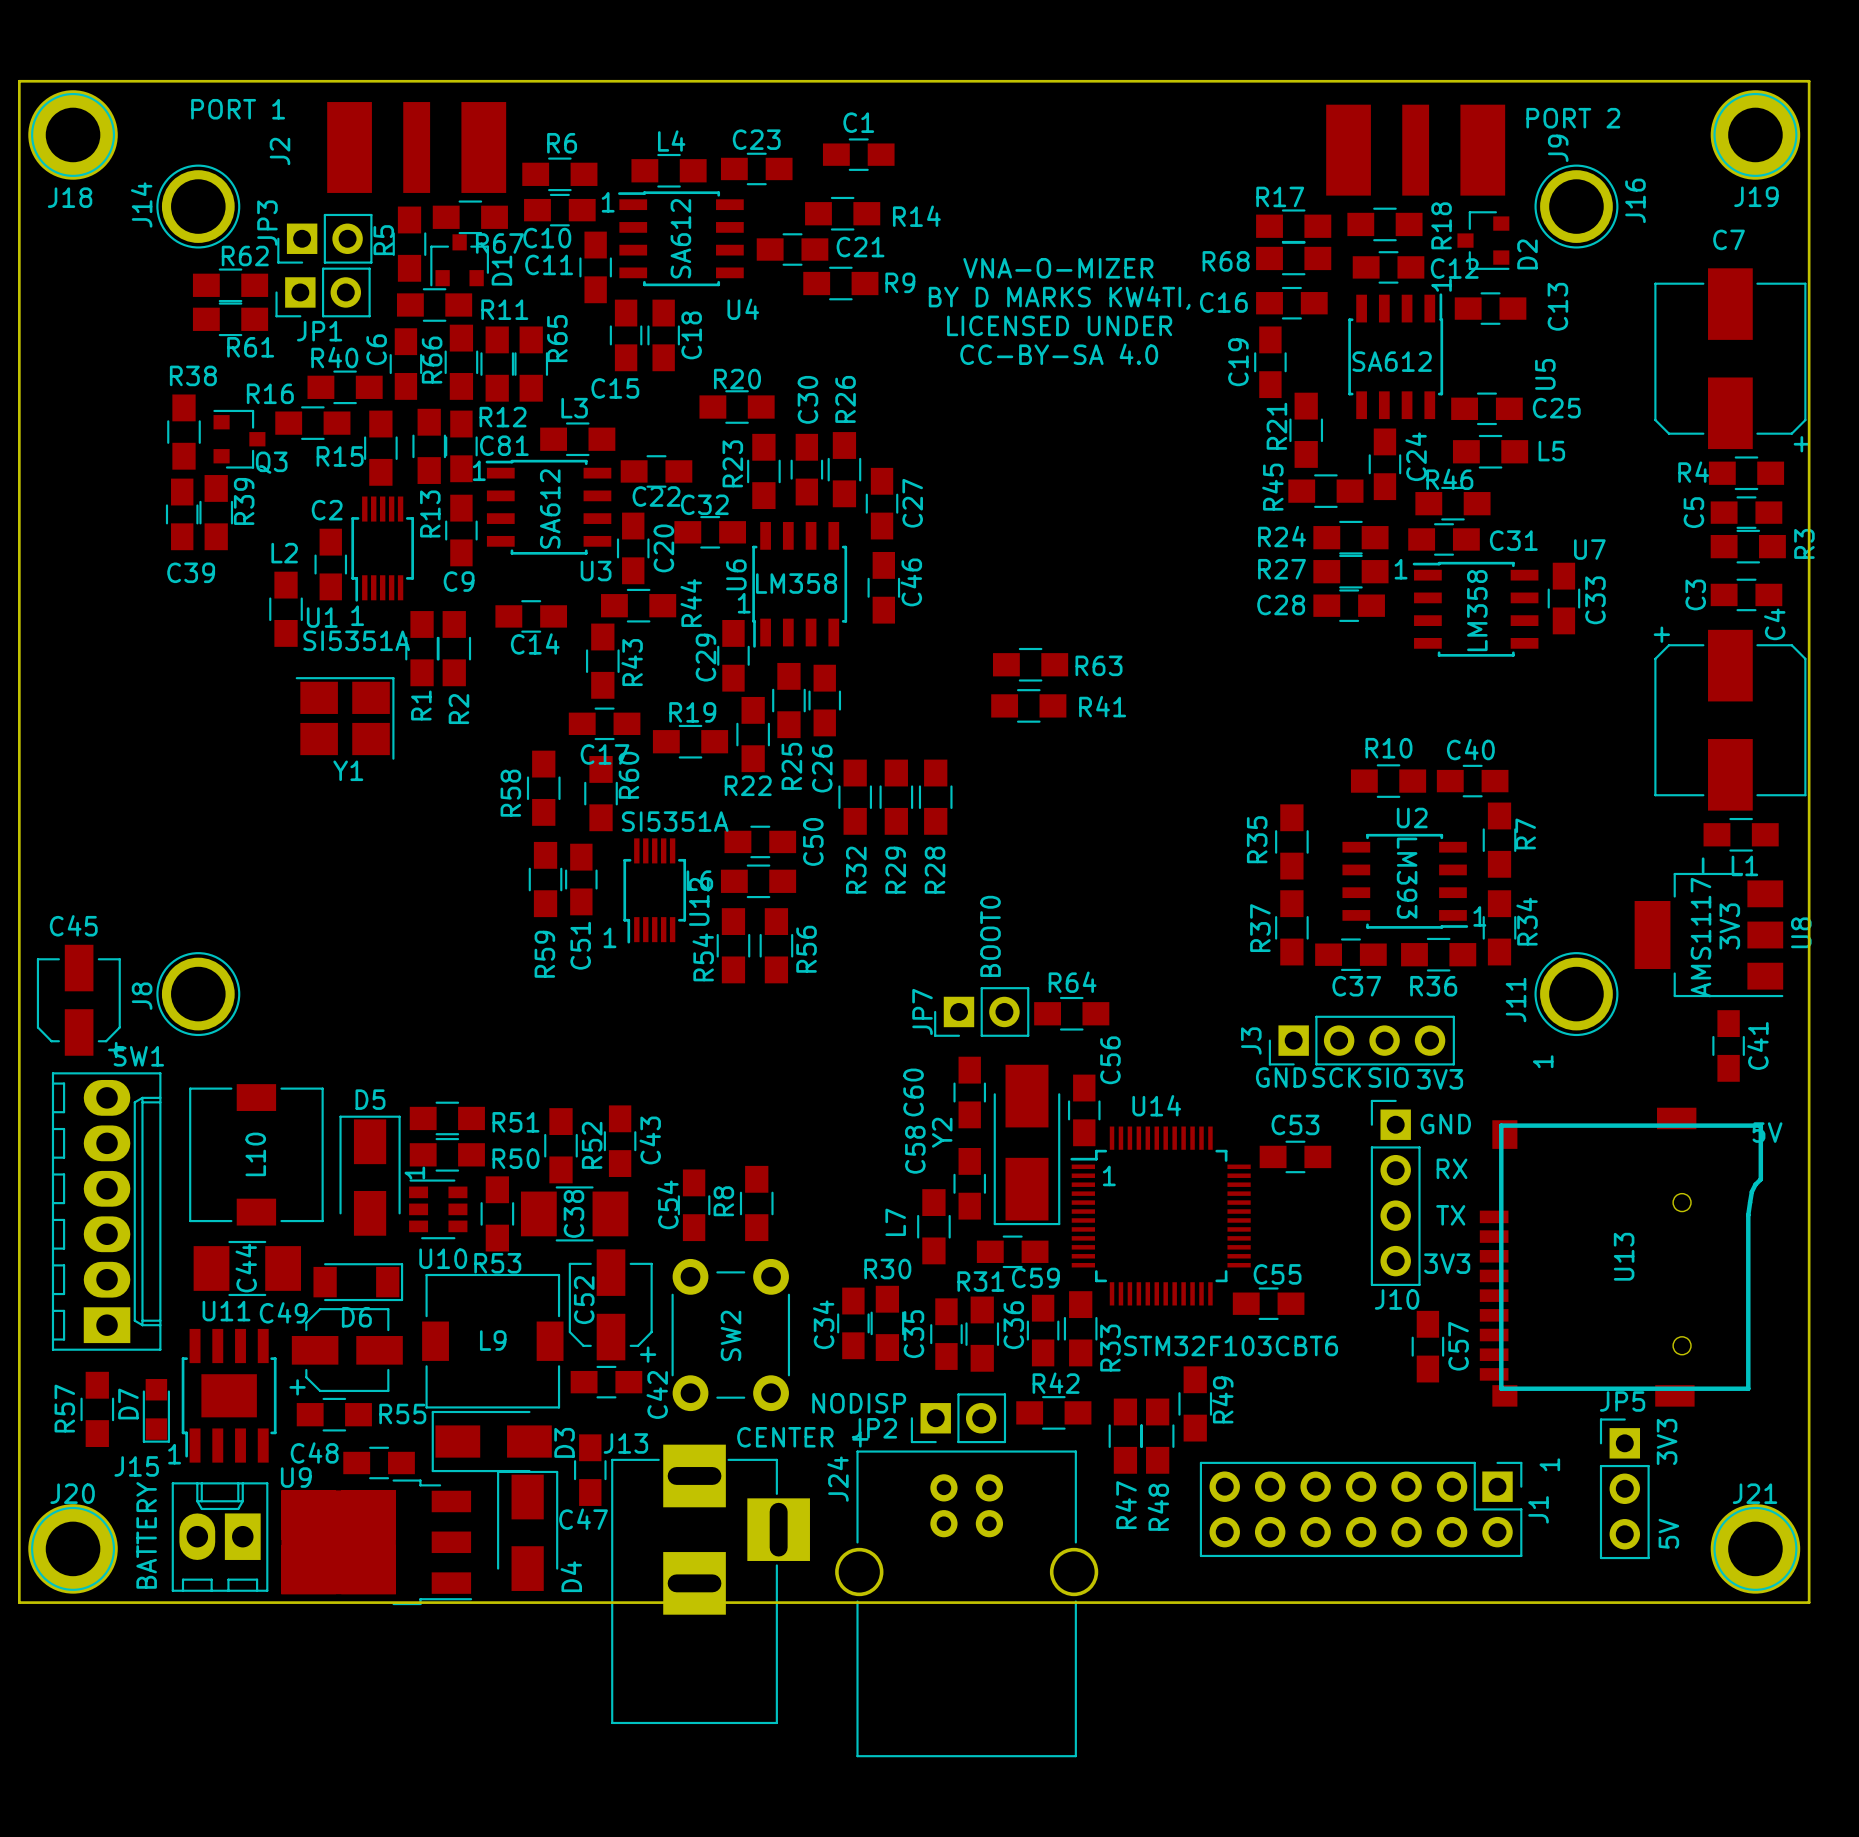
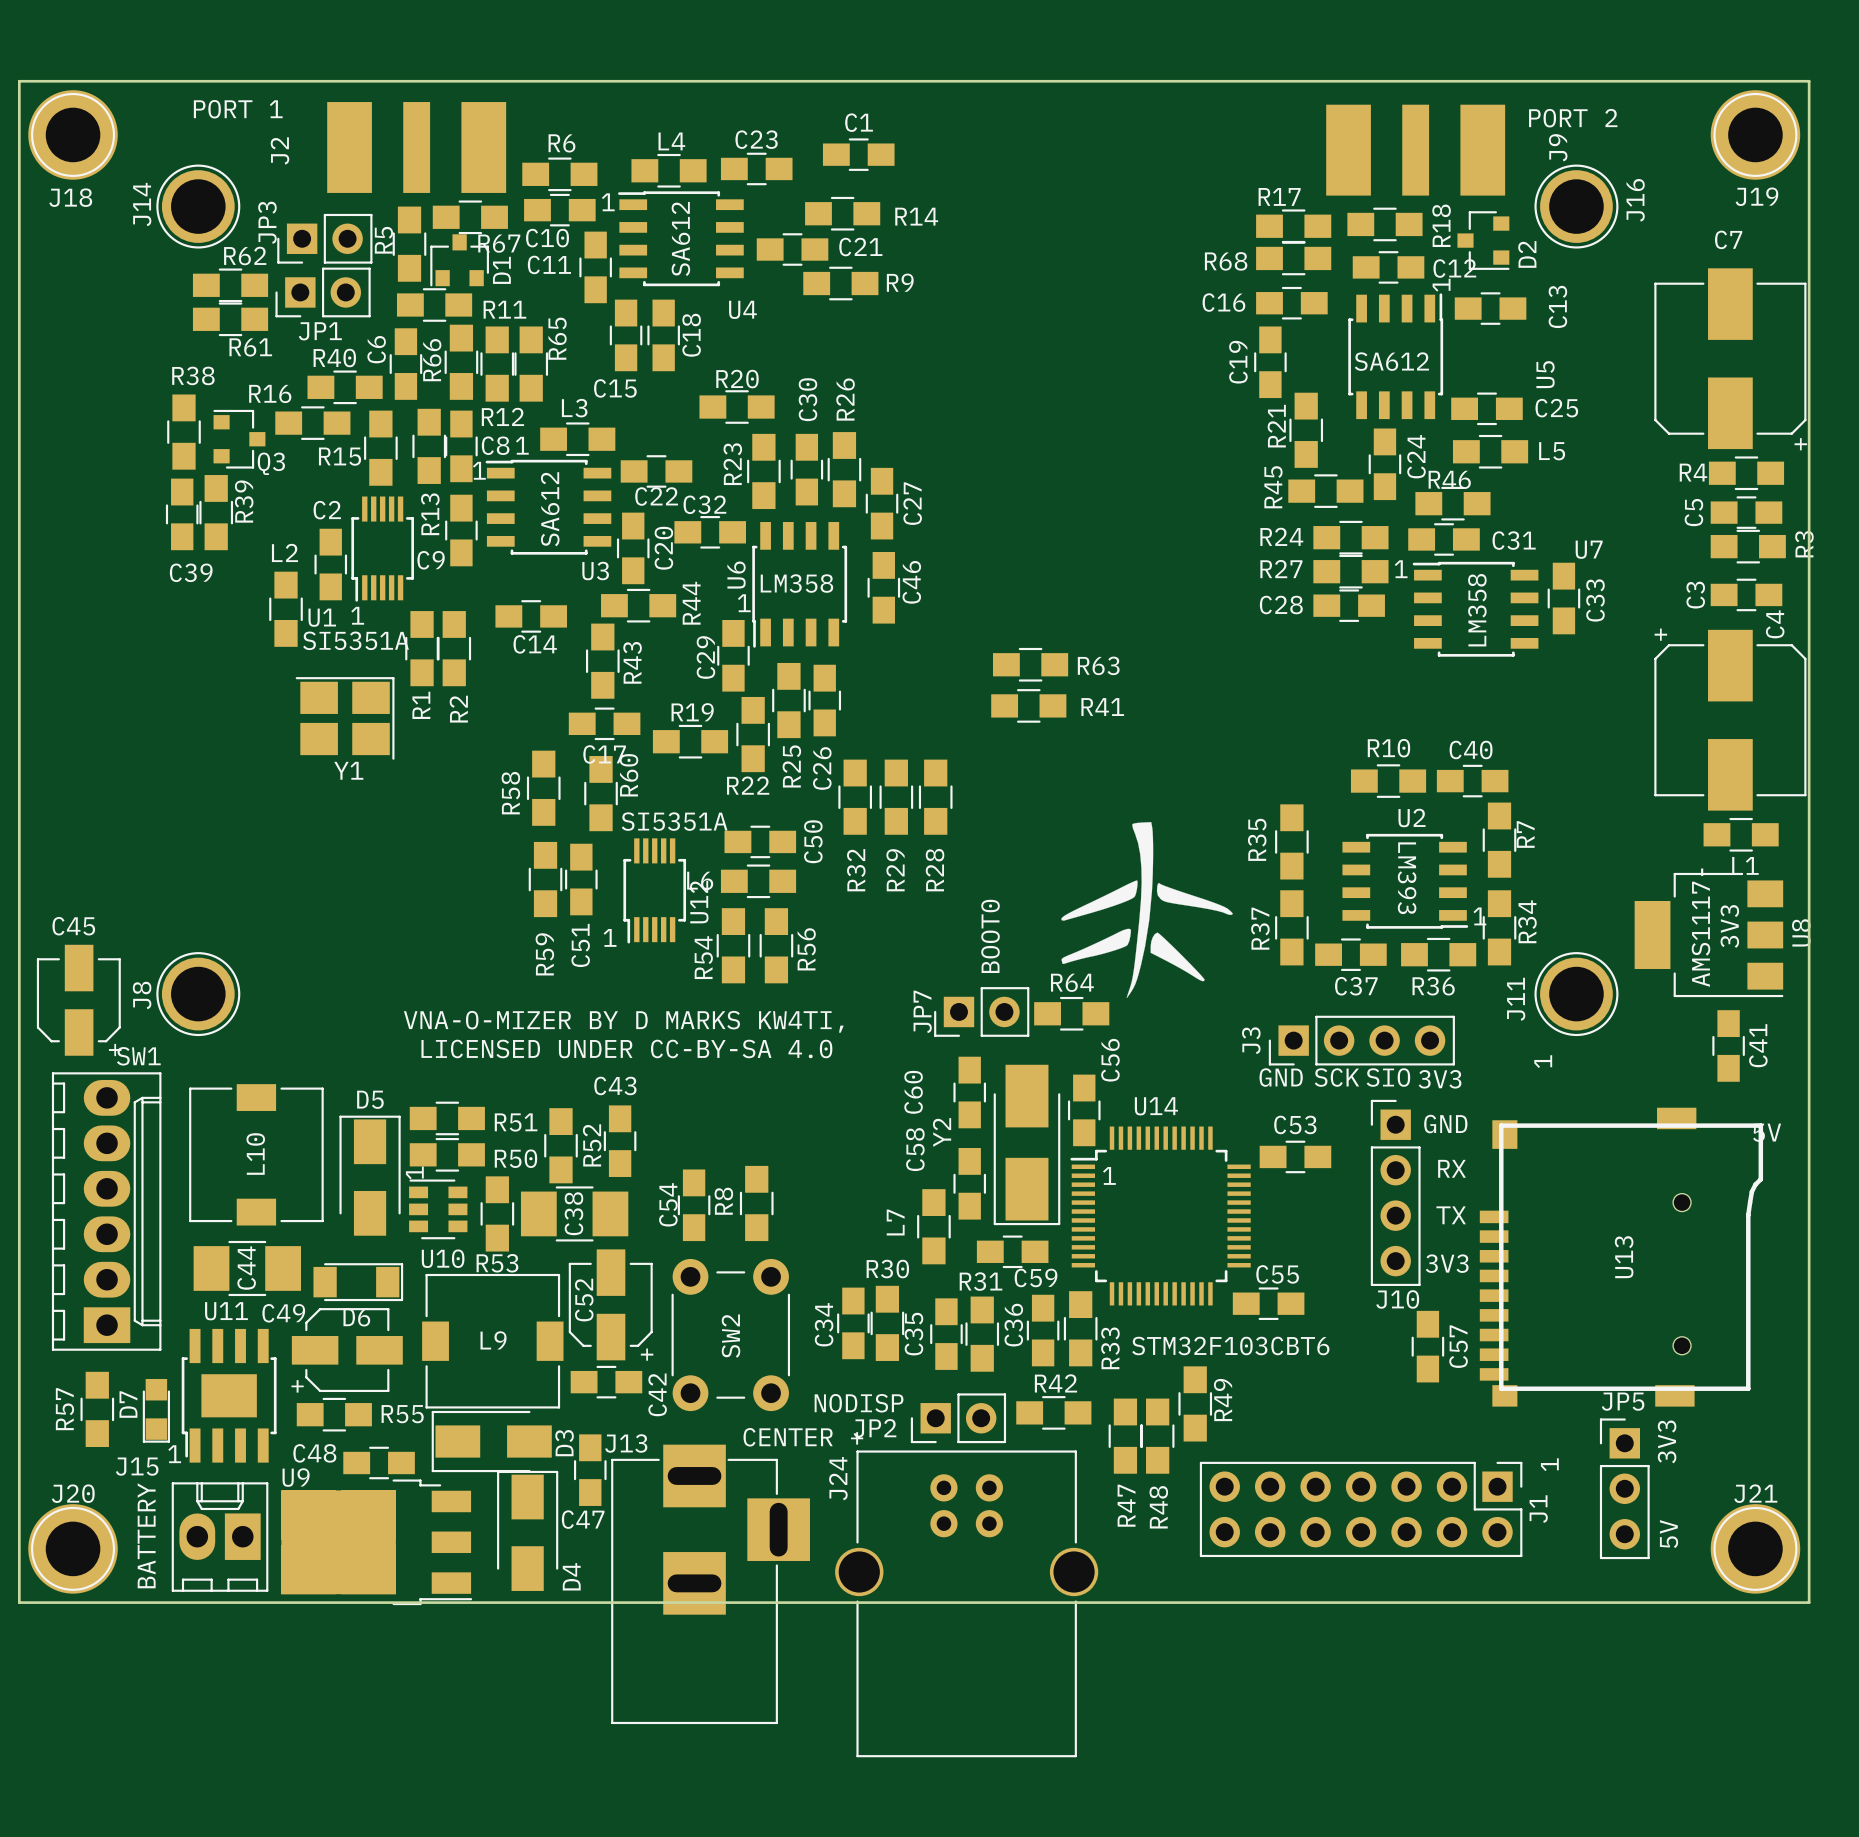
text: VNA-O-MIZER (1058, 268) -> none
text: BY D MARKS KW4TI, (1059, 297) -> none
text: LICENSED UNDER (1059, 325) -> none
text: CC-BY-SA 4.0 (1059, 354) -> none
C9 name position: C9 (459, 581) -> C9 (431, 560)
drawing: none -> [1061, 822, 1233, 999]
text: none -> VNA-O-MIZER BY D MARKS KW4TI, (623, 1021)
text: none -> LICENSED UNDER CC-BY-SA 4.0 (626, 1048)
C43 name rotation: 0° (650, 1140) -> 90° clockwise (615, 1085)
C43 name position: C43 (650, 1140) -> C43 (615, 1085)

